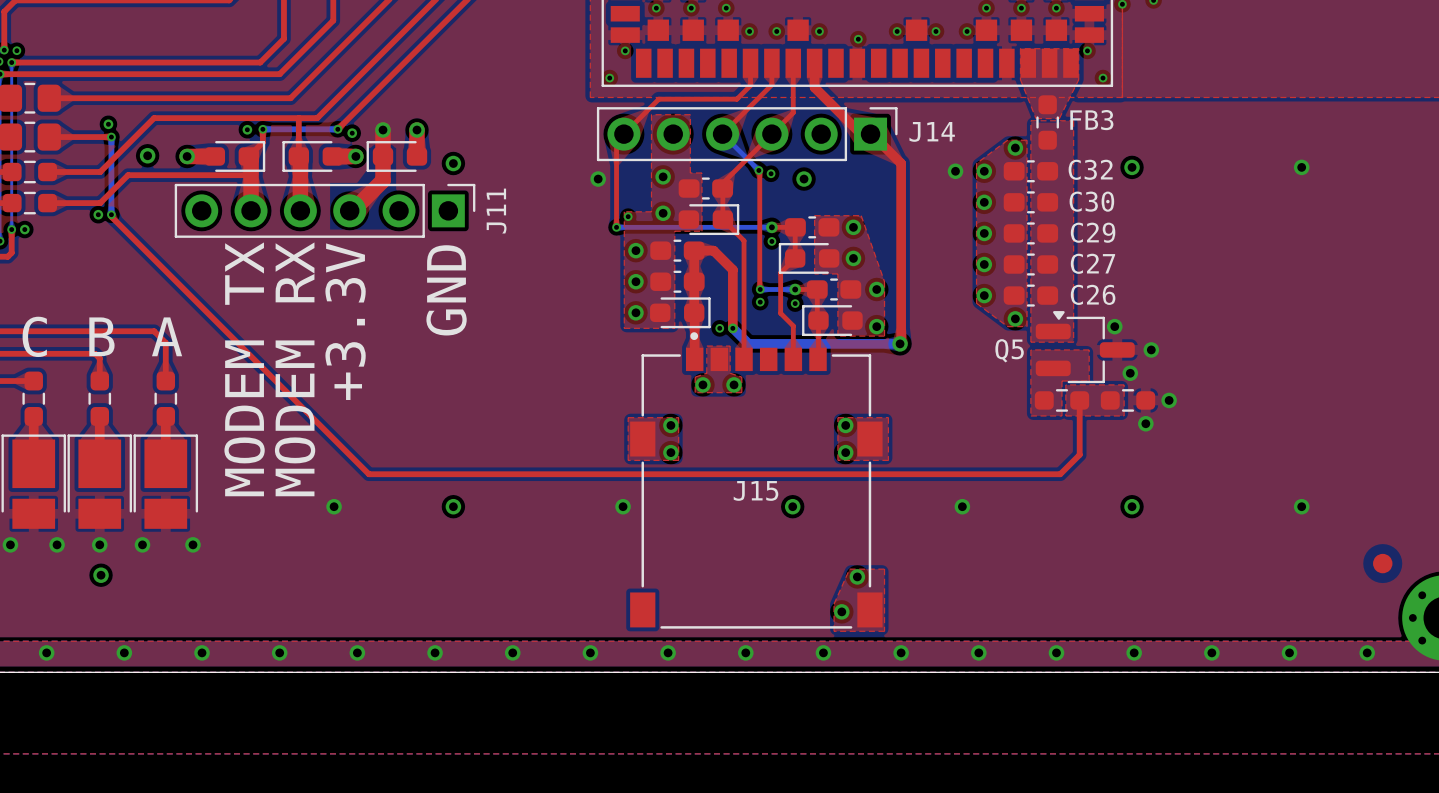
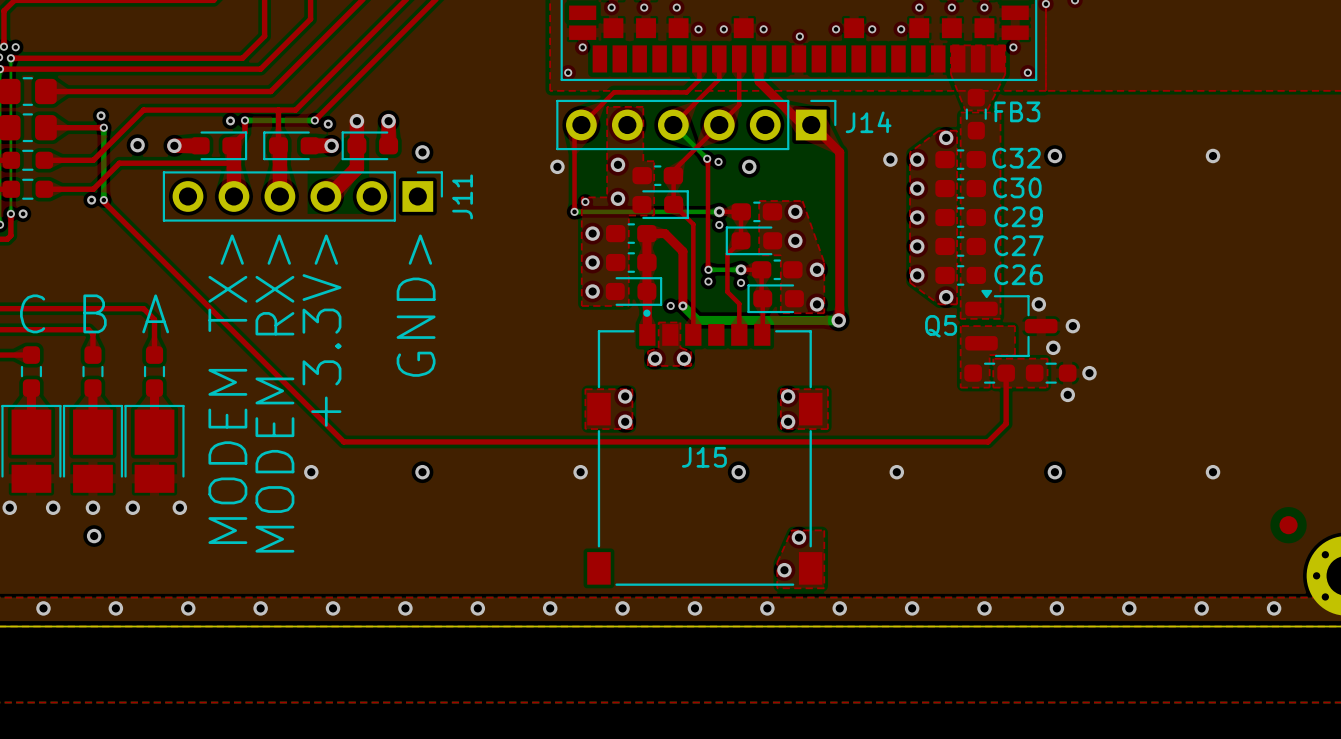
text: GND (446, 290) -> GND> (416, 305)
text: +3.3V (345, 321) -> +3.3V> (321, 330)
text: MODEM TX (244, 369) -> MODEM TX> (227, 389)
text: MODEM RX (295, 369) -> MODEM RX> (274, 393)

